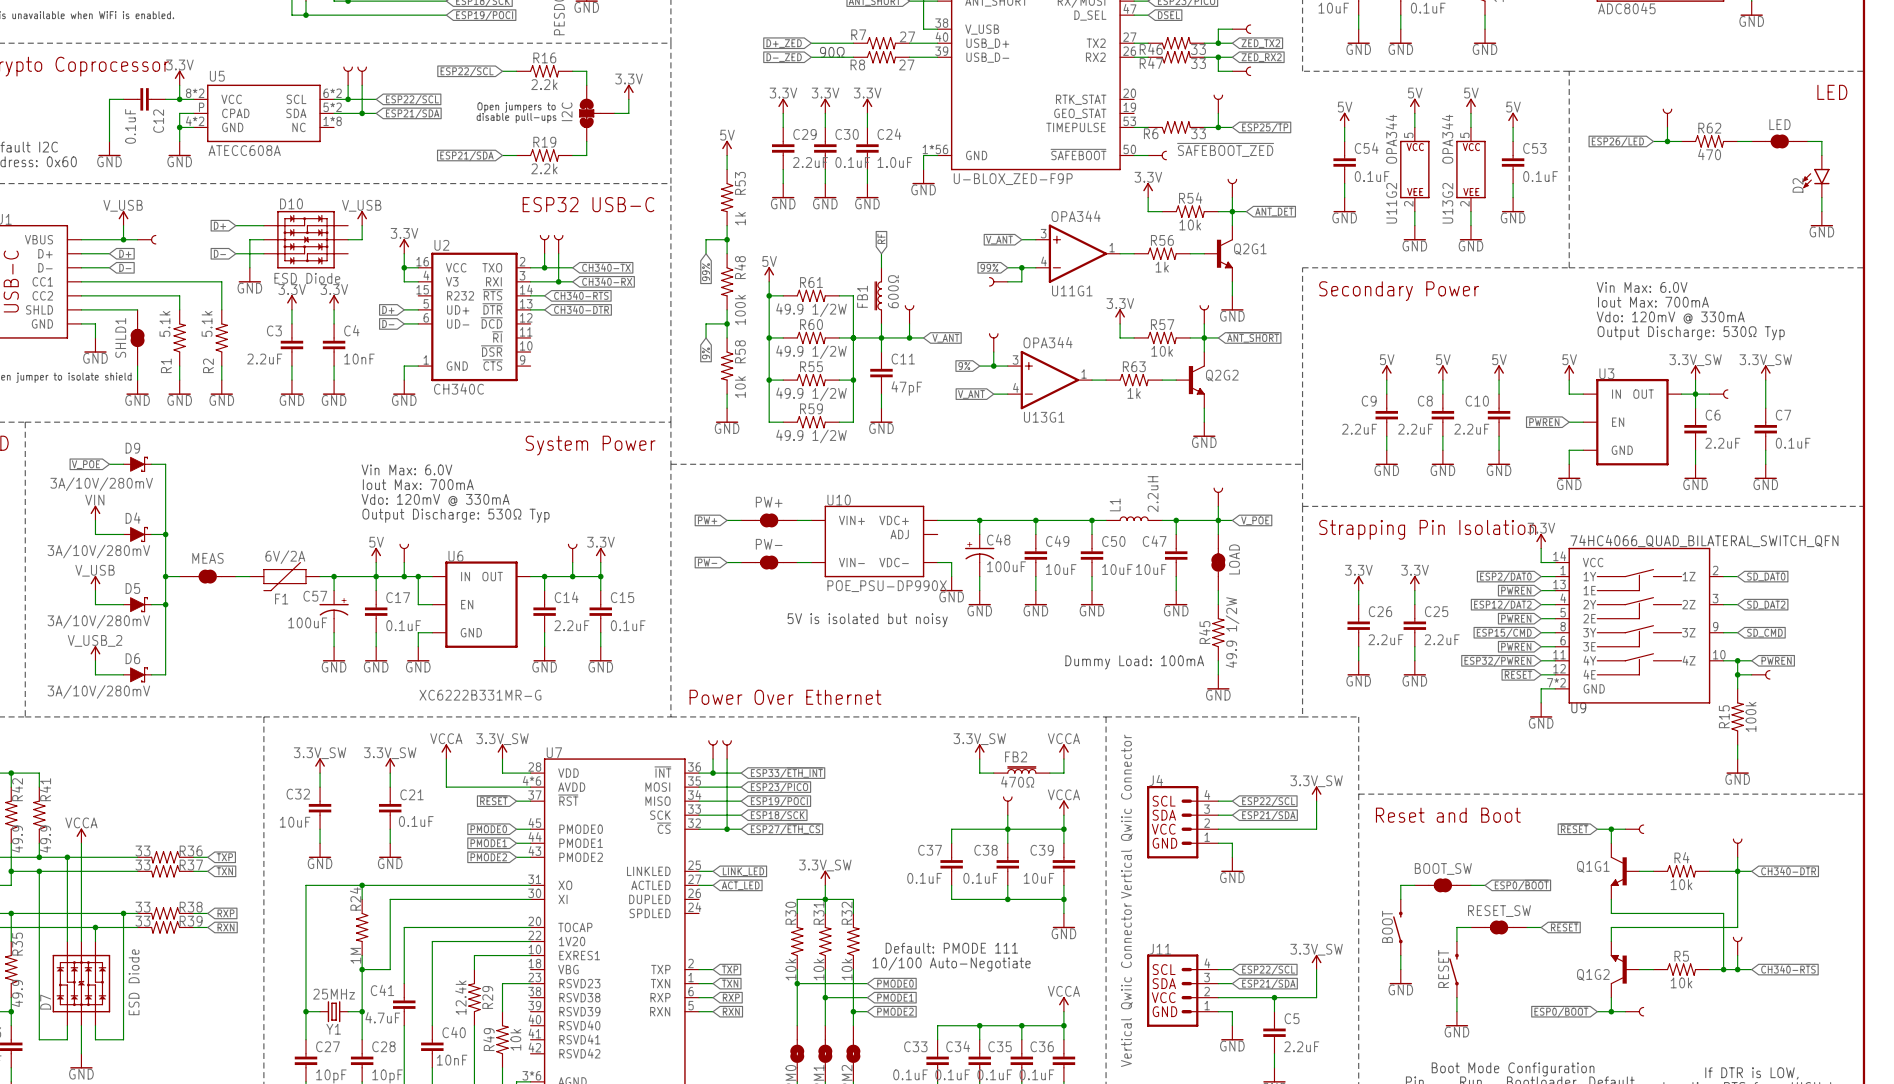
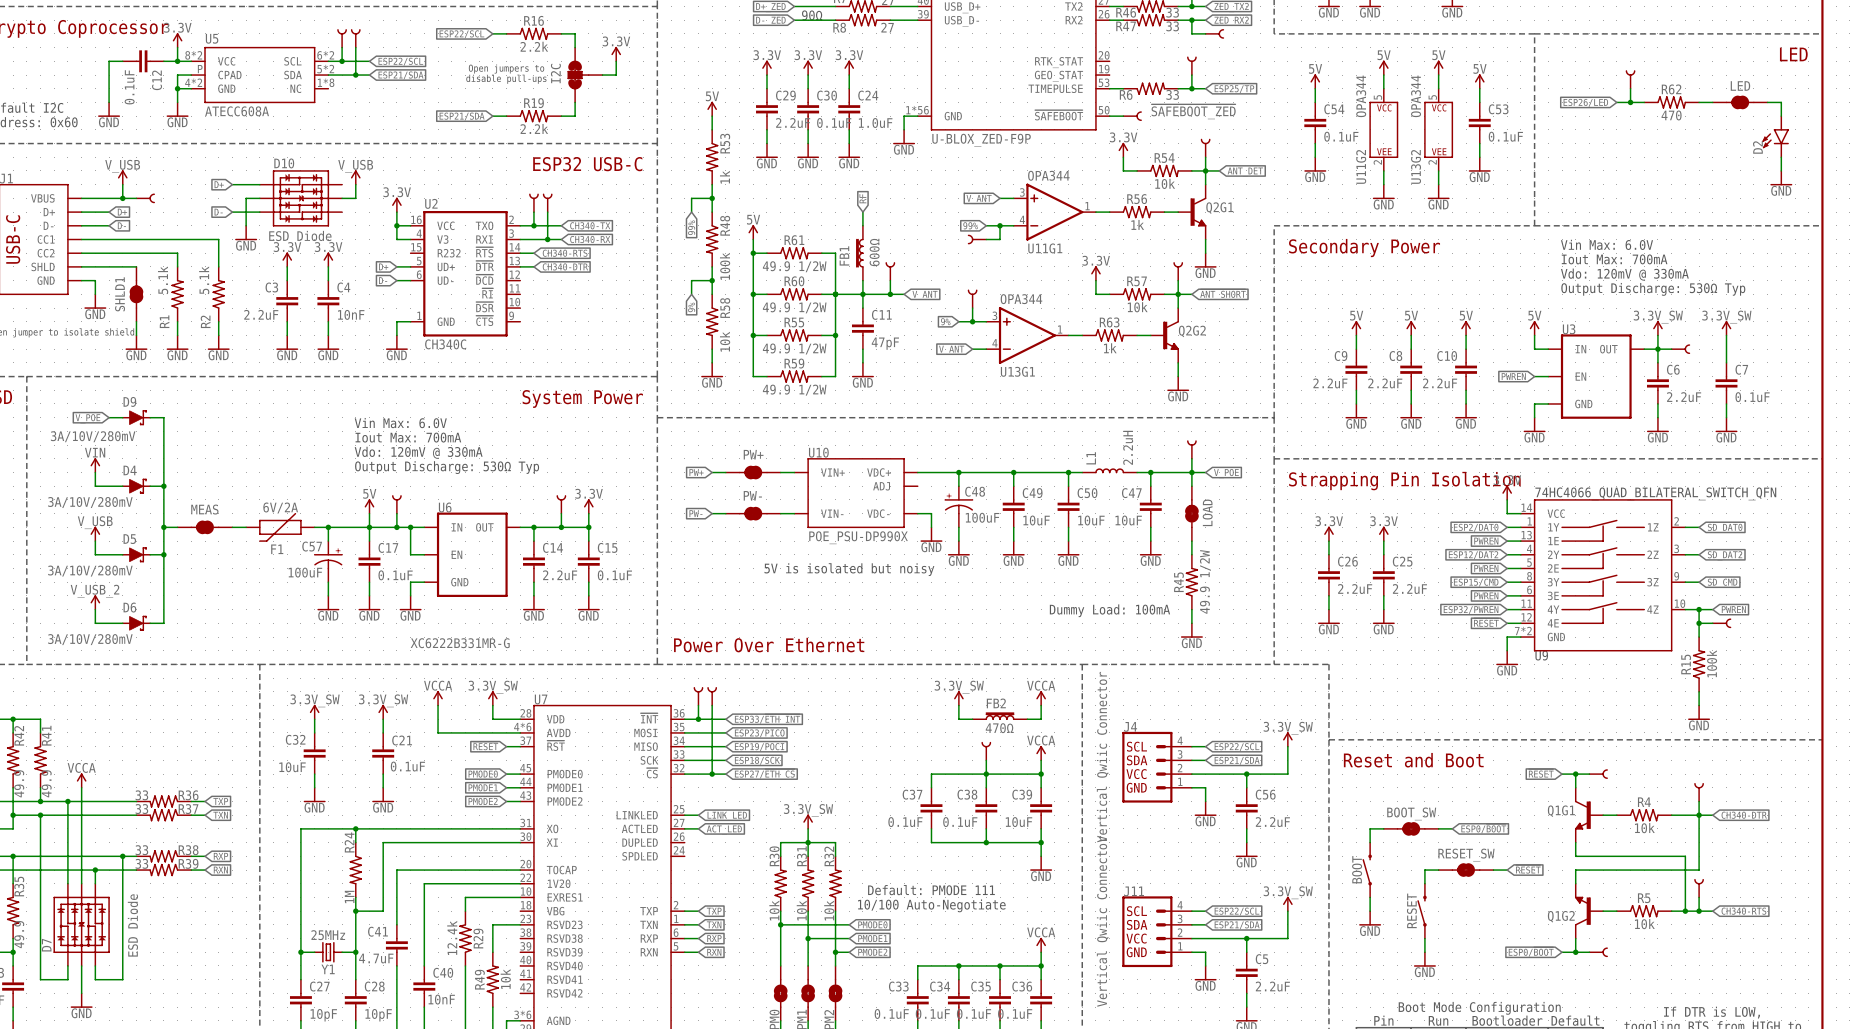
wire: none -> (1246, 774) (1246, 787)
junction: none -> (1246, 774)
C56: none -> 2.2uF (1246, 808)
wire: none -> (1246, 828) (1246, 842)
power symbol: none -> GND (1246, 849)

